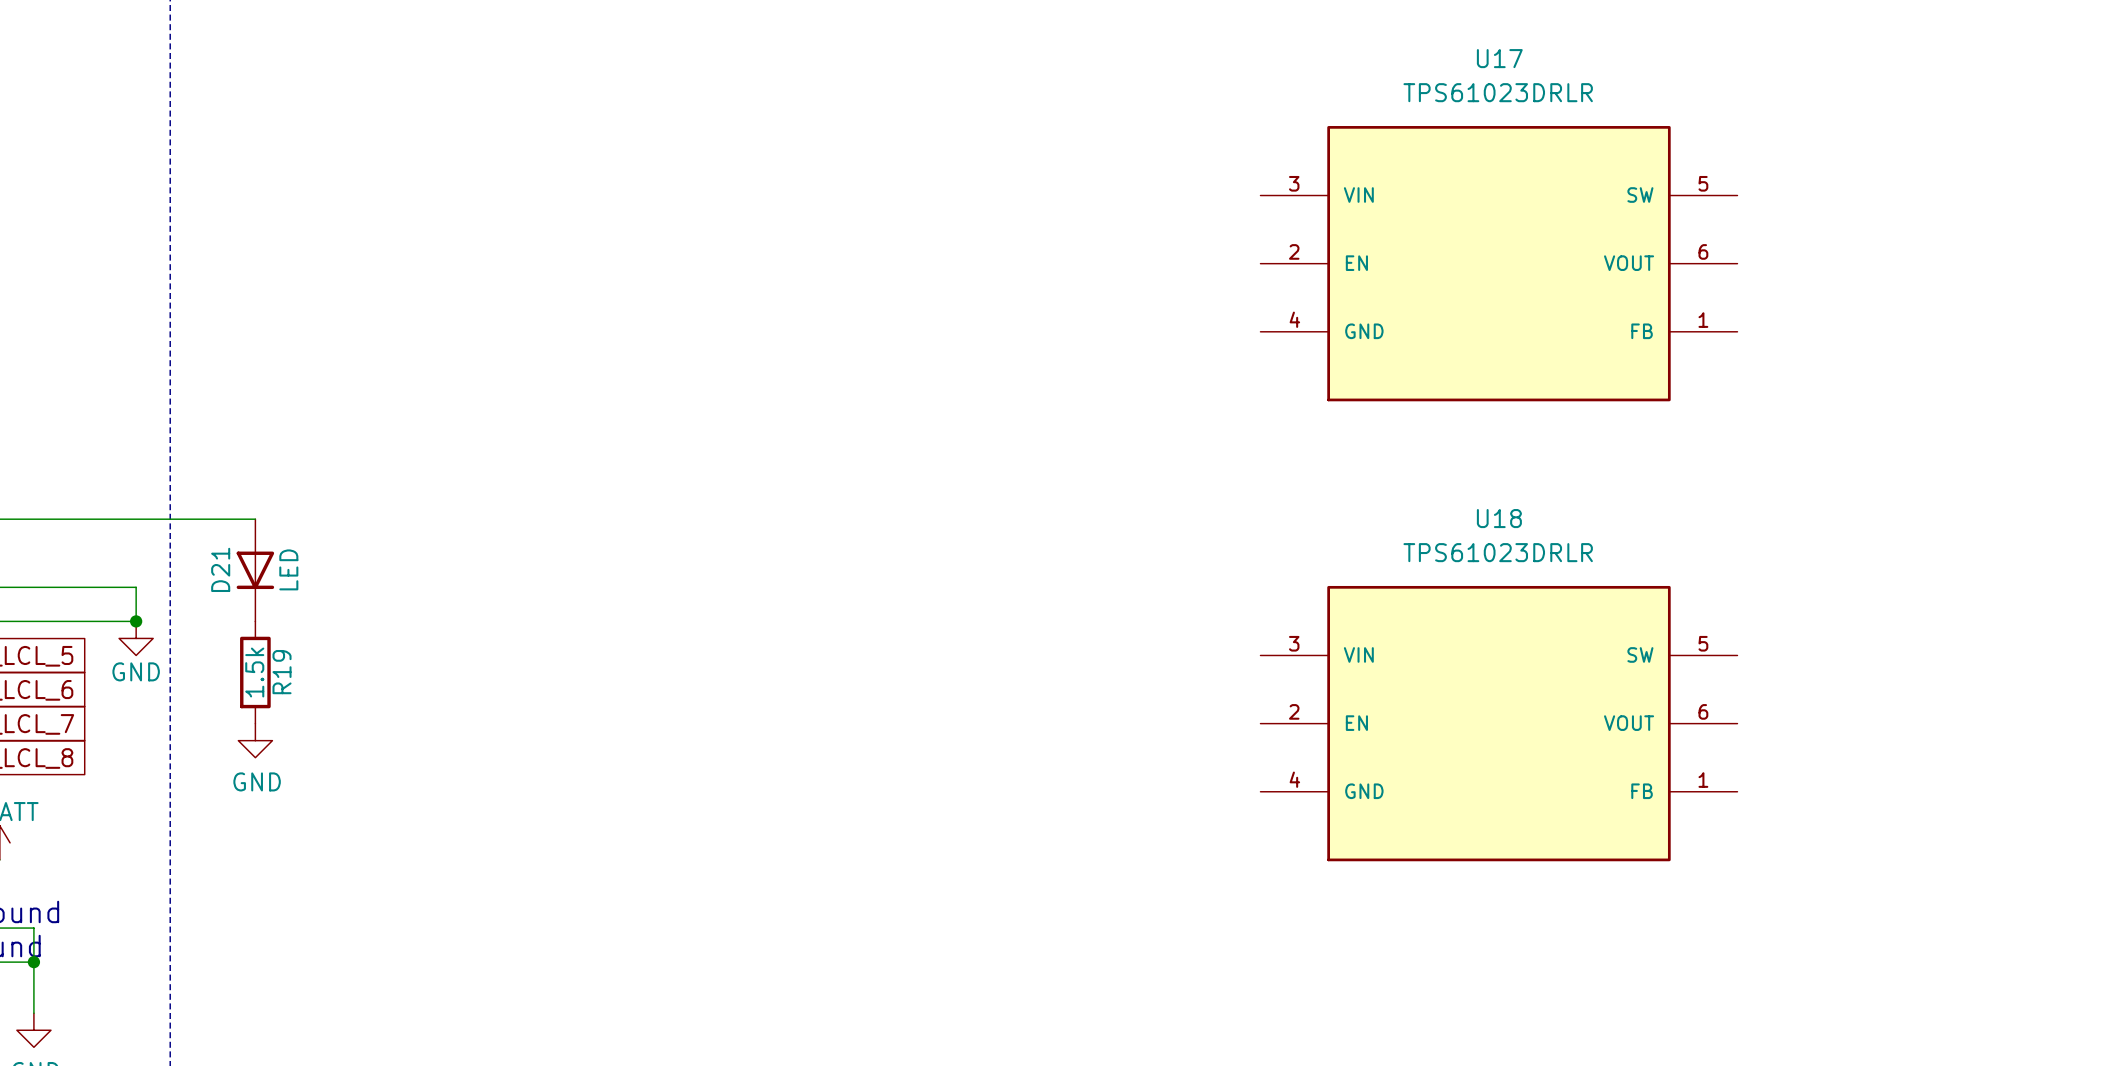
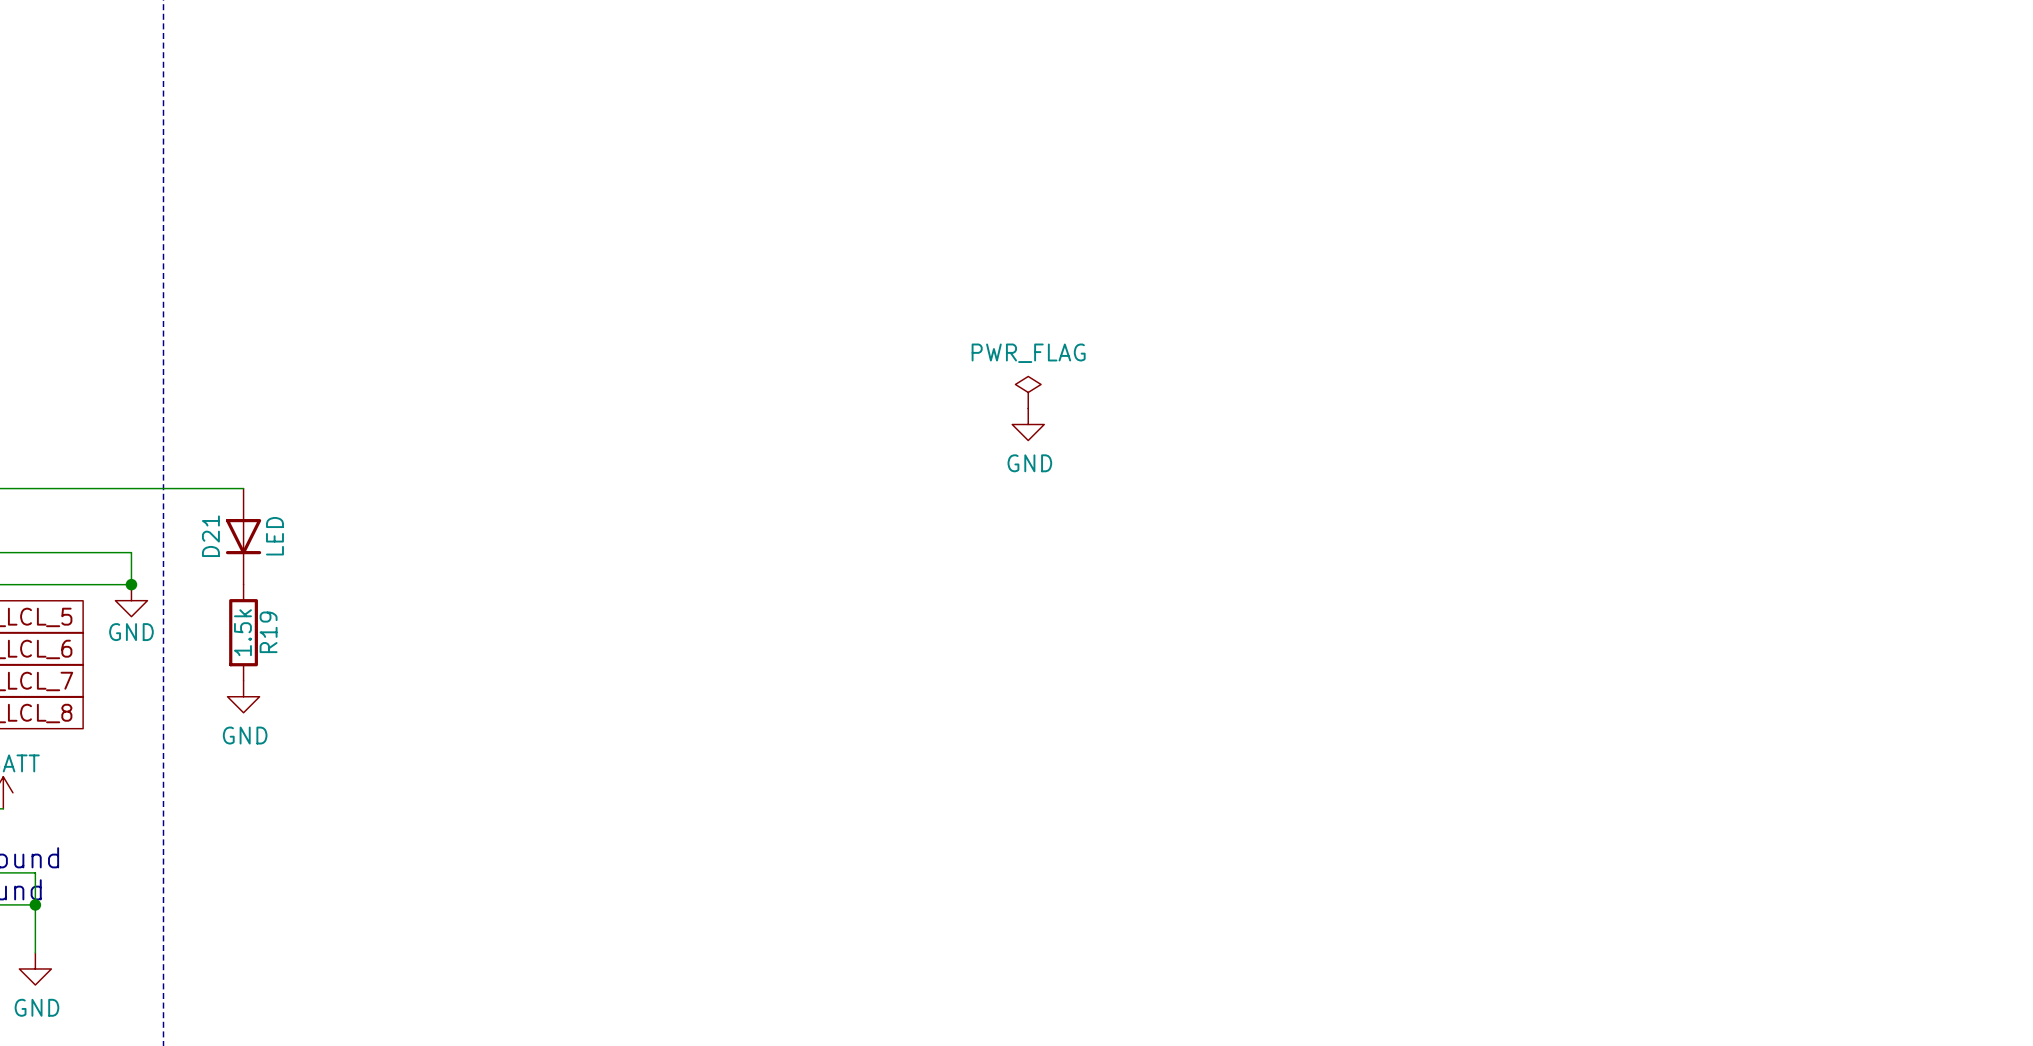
U17: TPS61023DRLR (1498, 263) -> none
power symbol: none -> PWR_FLAG (1028, 392)
power symbol: none -> GND (1028, 424)
U18: TPS61023DRLR (1498, 723) -> none

